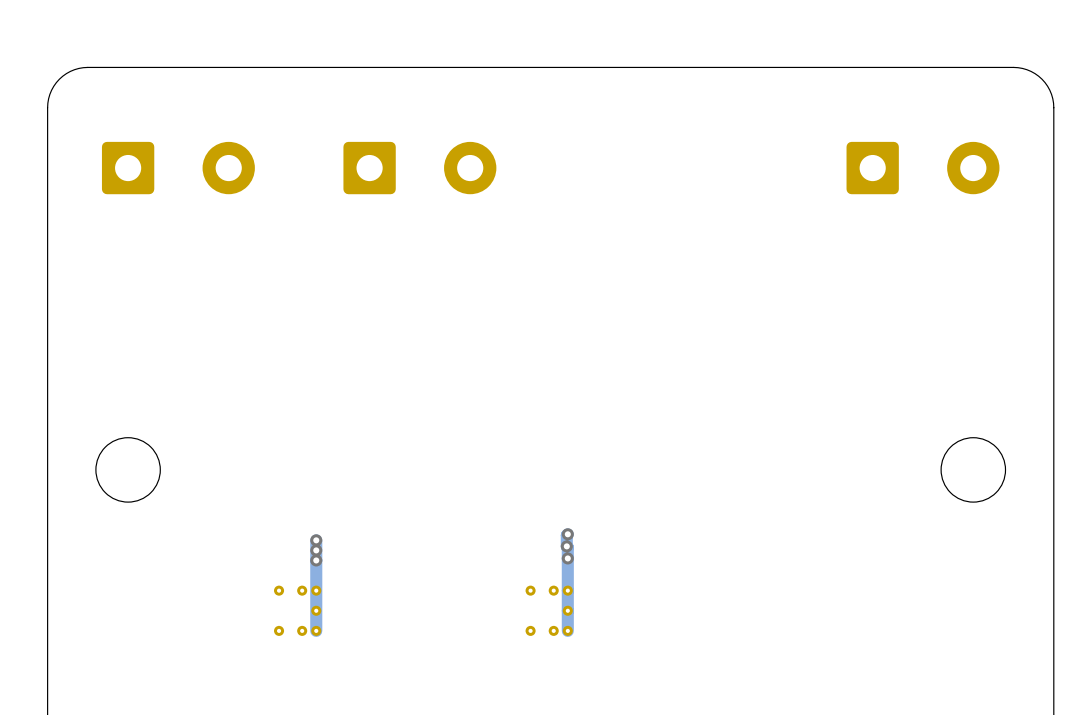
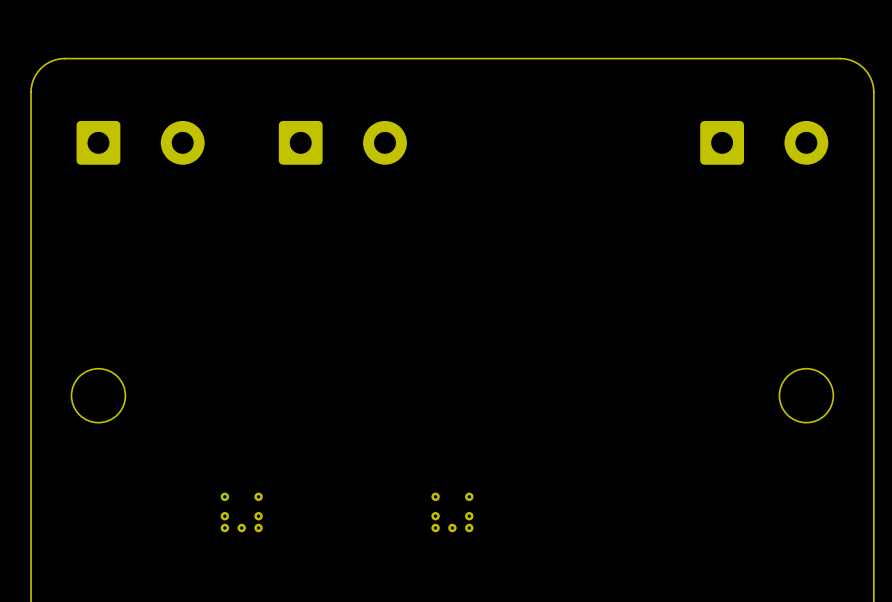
track: (567, 534) (567, 630) -> none
via: (567, 534) -> none
track: (316, 540) (316, 630) -> none
via: (316, 540) -> none
via: (566, 546) -> none
via: (316, 550) -> none
via: (567, 558) -> none
via: (316, 560) -> none
part rotation: 0° (297, 610) -> 90° clockwise (241, 512)
part rotation: 0° (549, 610) -> 90° clockwise (452, 512)

